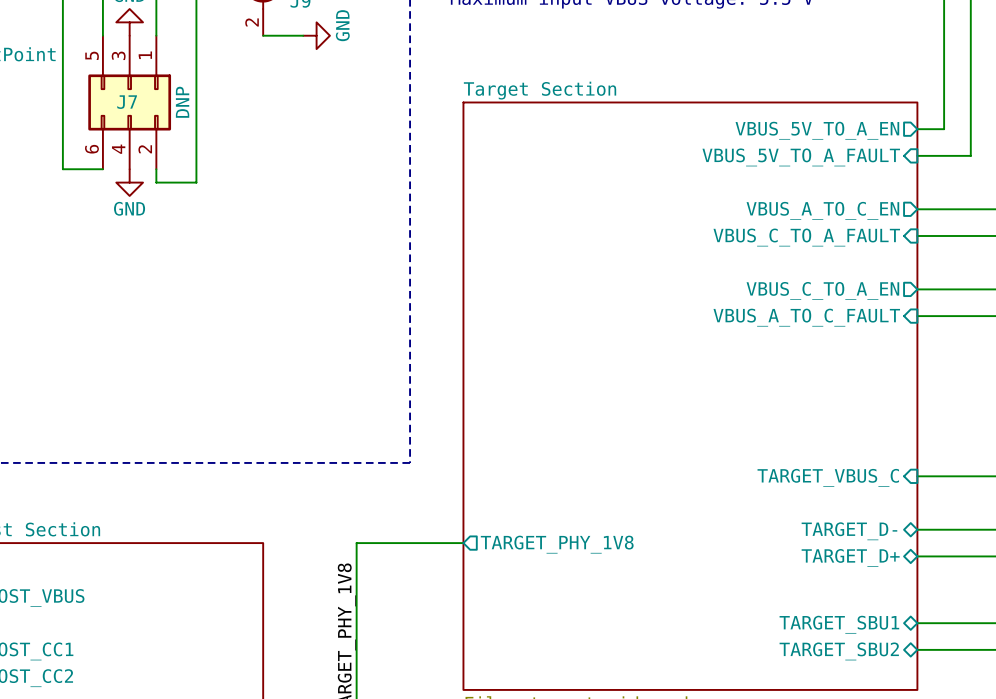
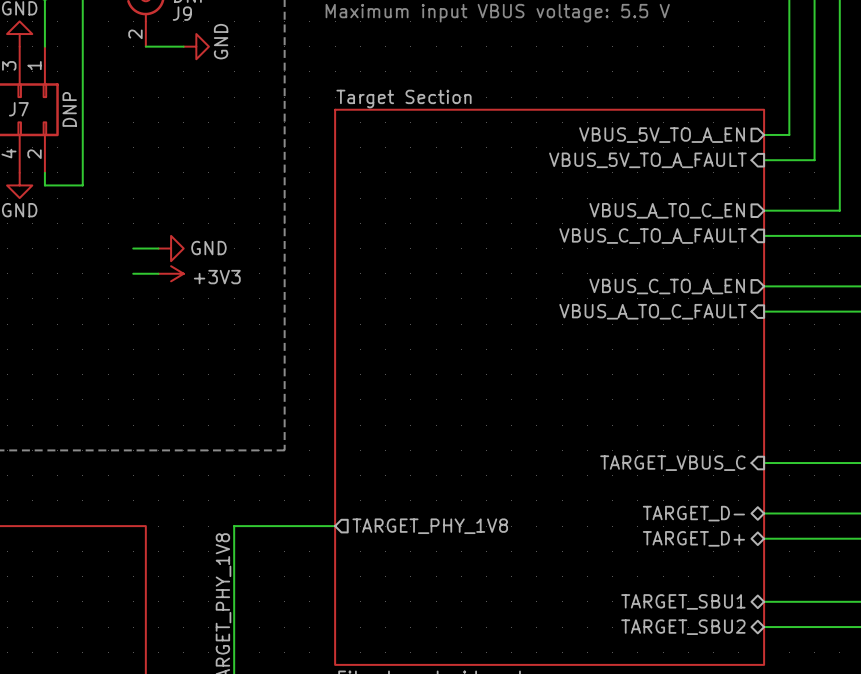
wire: none -> (133, 248) (158, 248)
power symbol: none -> GND (171, 248)
wire: none -> (133, 273) (158, 273)
power symbol: none -> +3V3 (171, 273)

